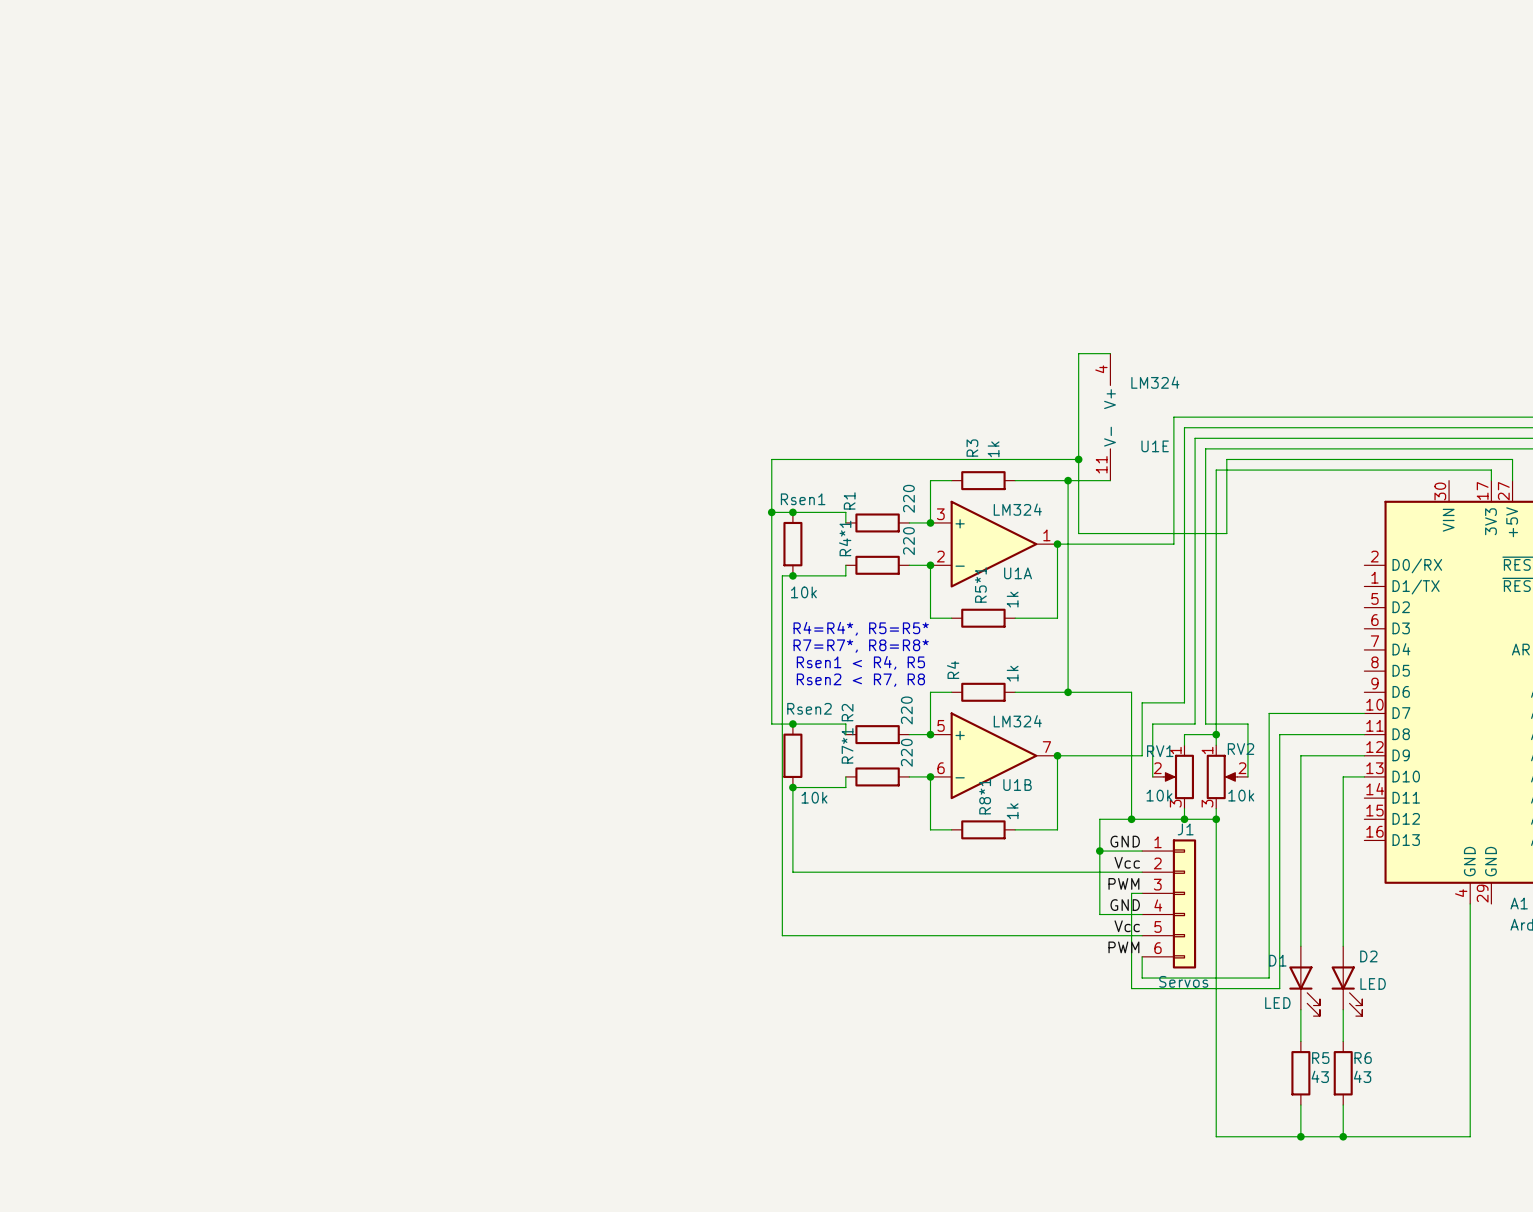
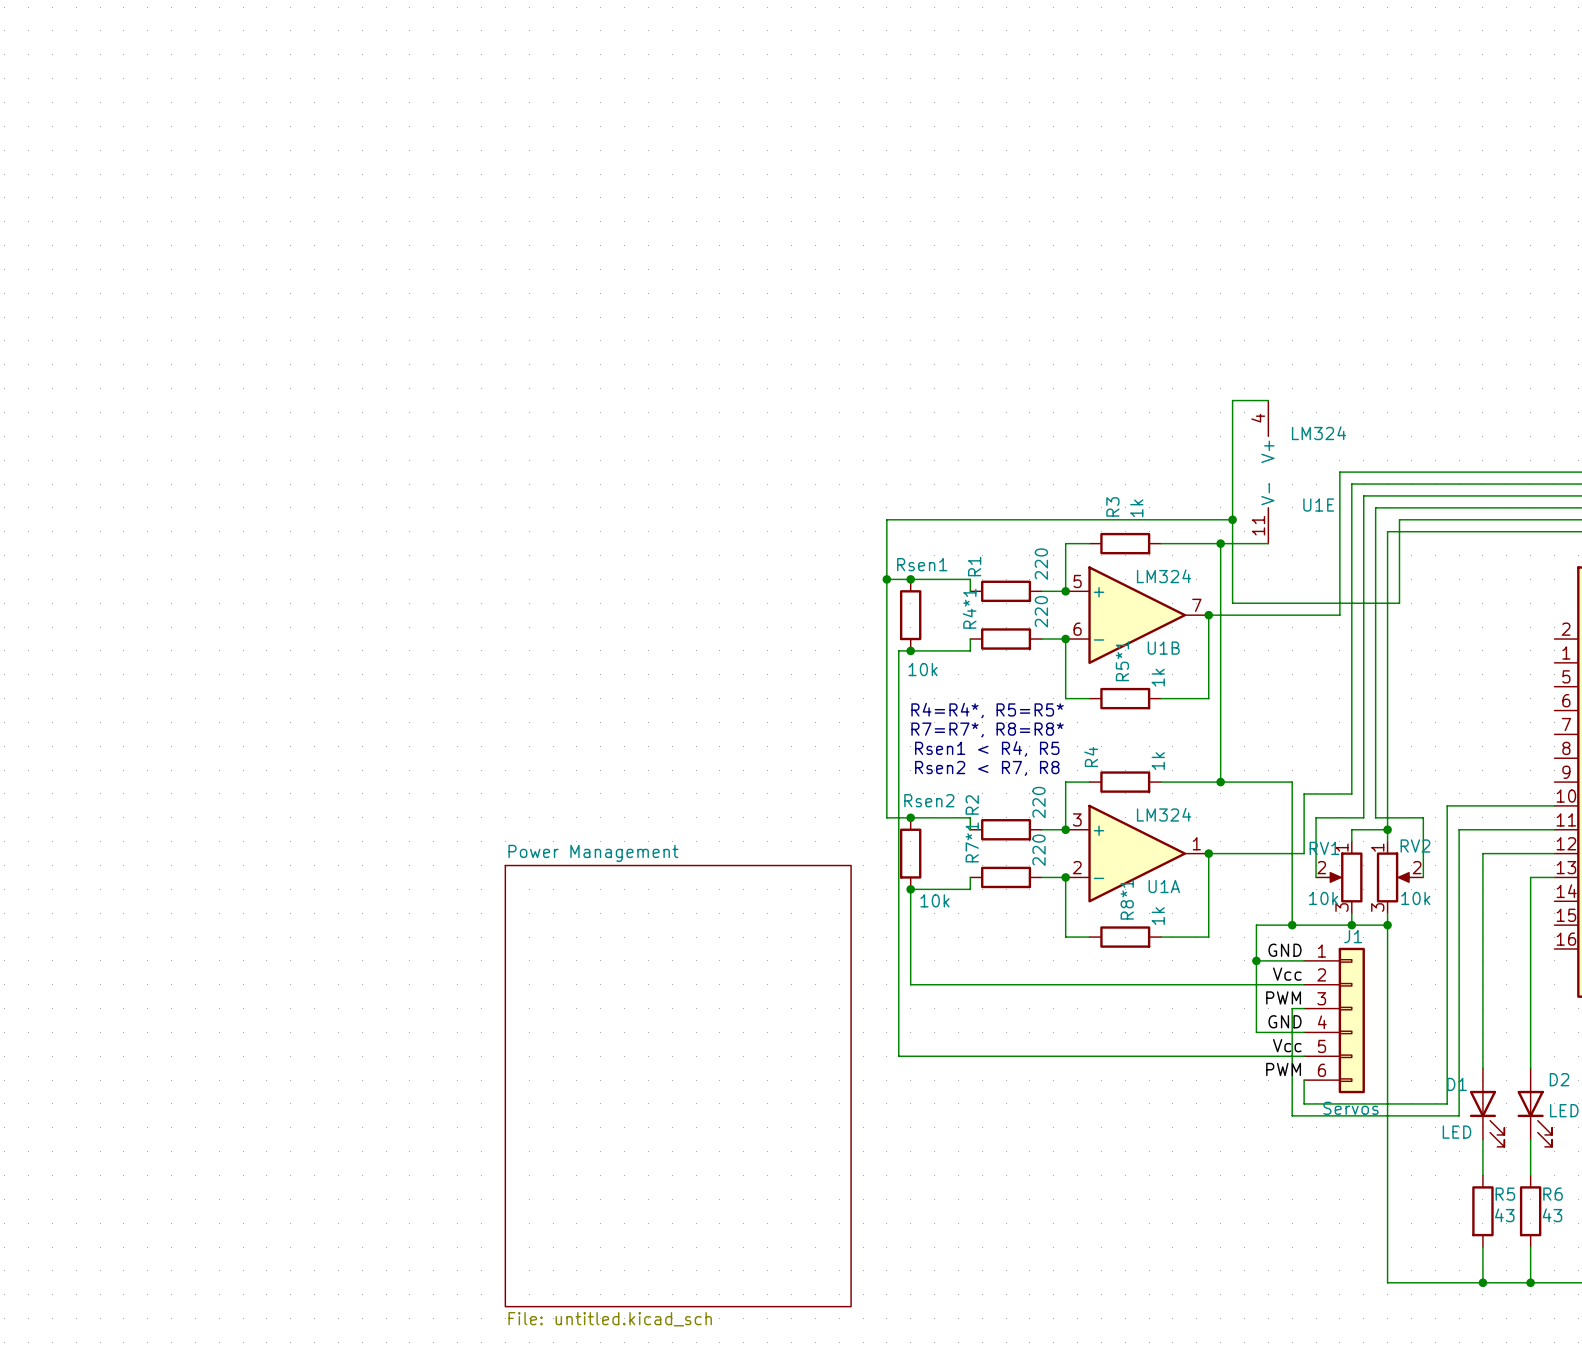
U1A position: (993, 544) -> (1137, 853)
U1B position: (993, 755) -> (1137, 615)
sheet Power Management: none -> File: untitled.kicad_sch (678, 1086)

